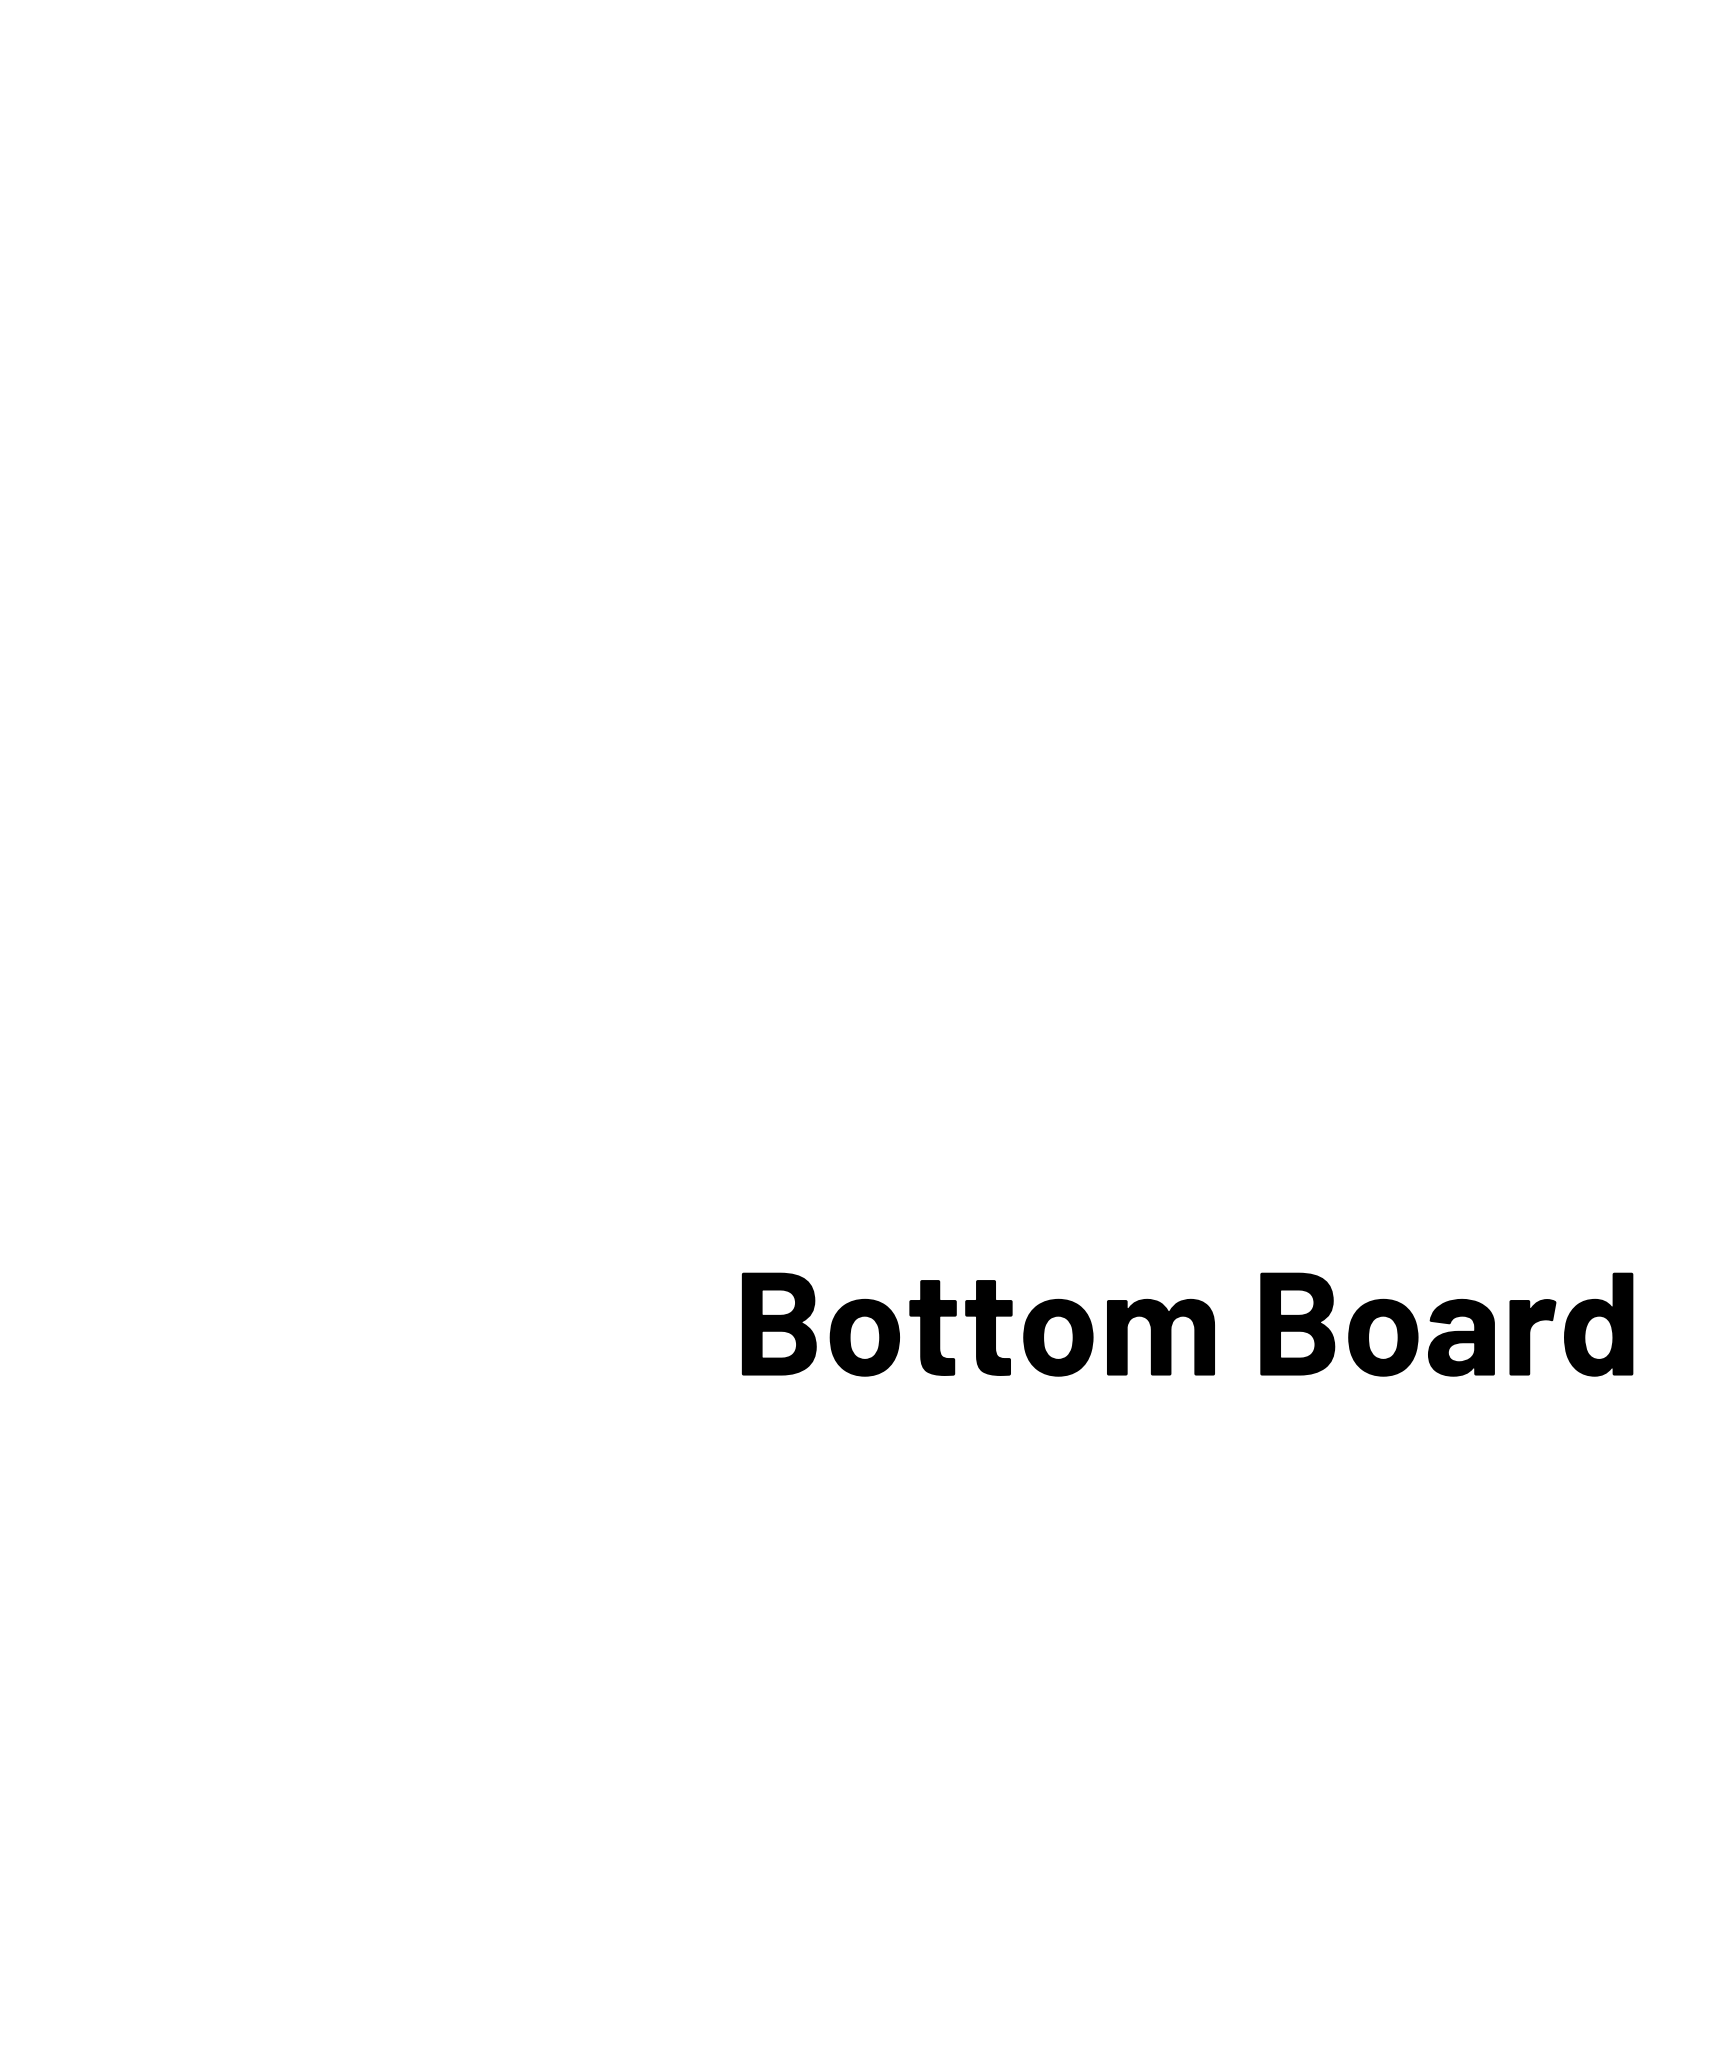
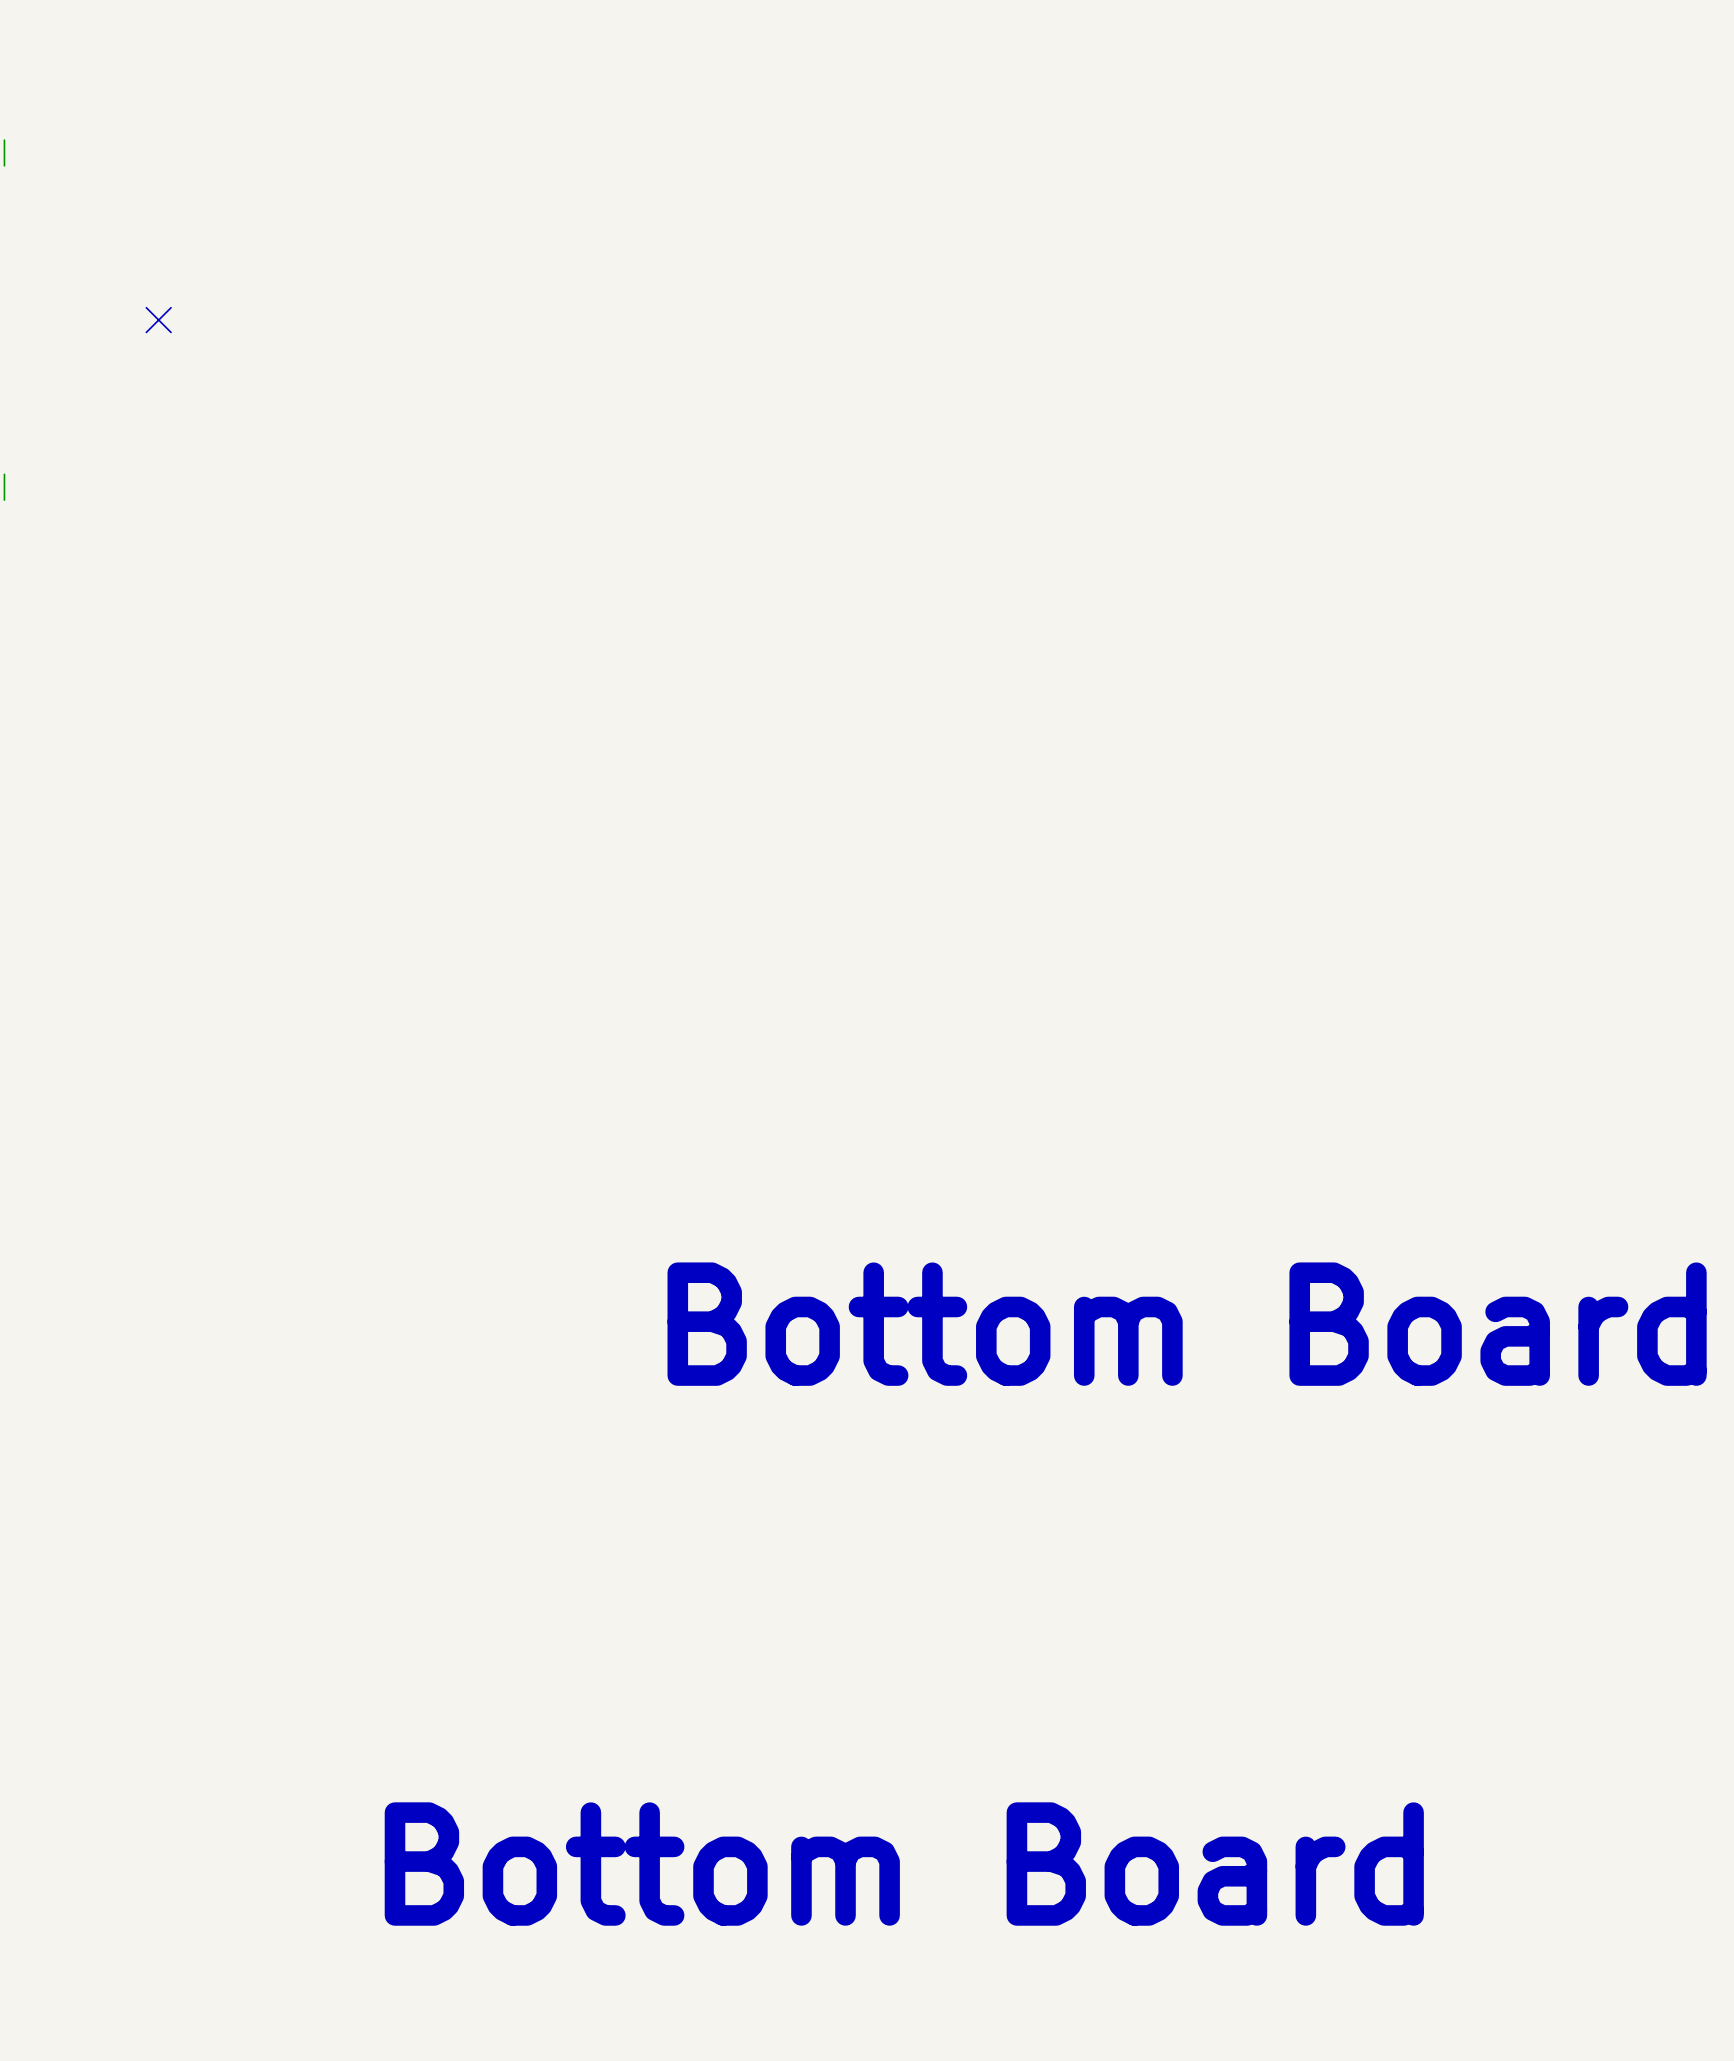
wire: none -> (4, 140) (4, 165)
no-connect mark: none -> (158, 320)
wire: none -> (4, 474) (4, 500)
text: none -> Bottom Board (904, 1864)

